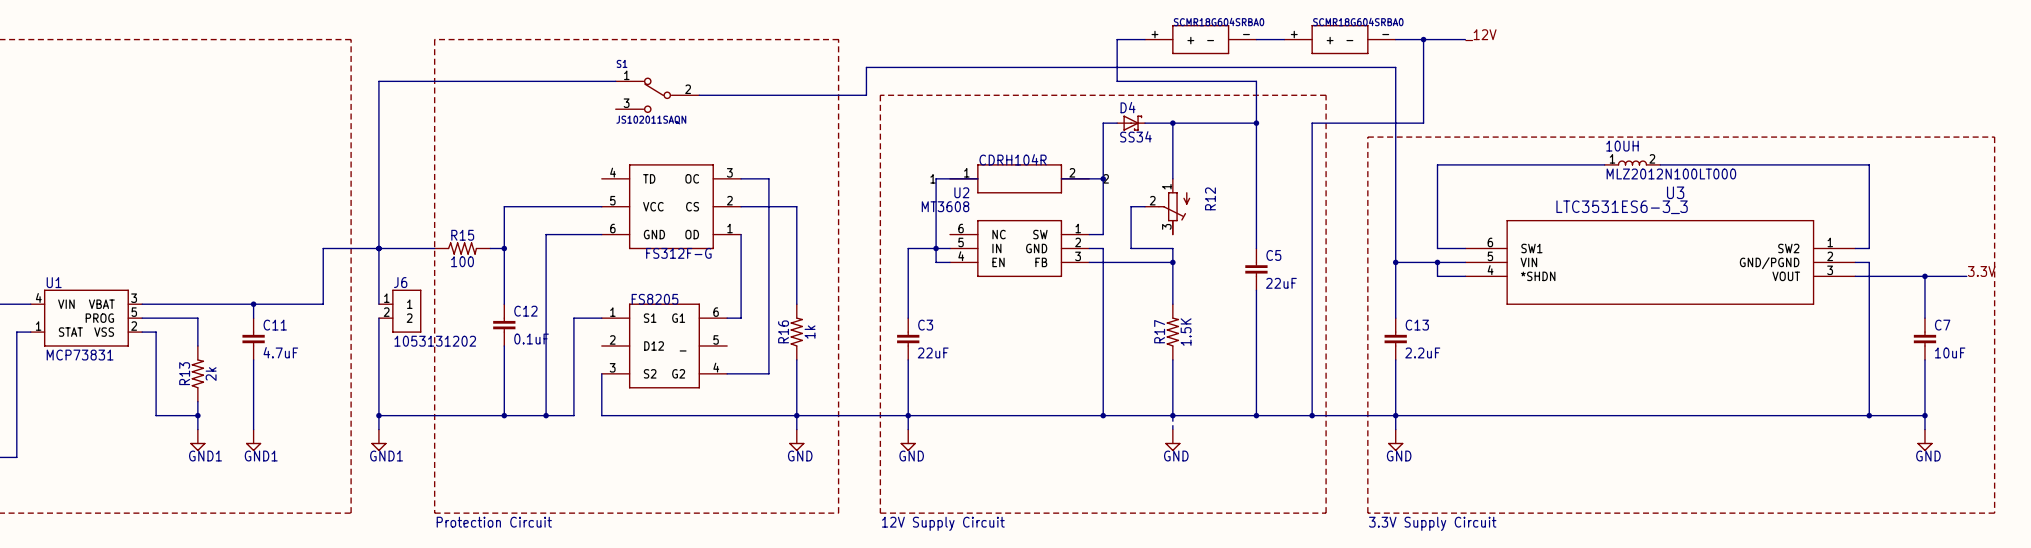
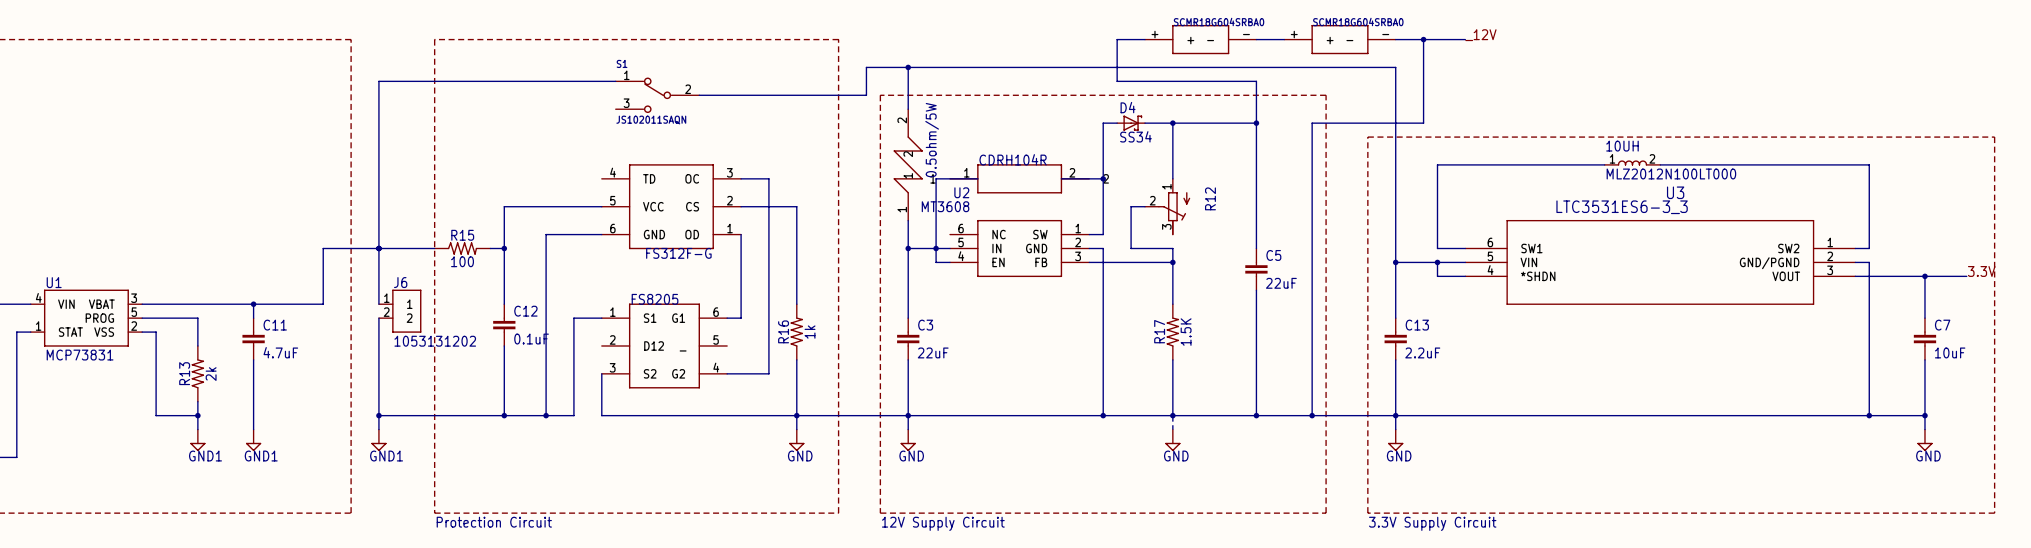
wire: none -> (908, 67) (908, 109)
junction: none -> (908, 67)
part: none -> (908, 164)
wire: none -> (908, 220) (908, 248)
junction: none -> (908, 248)

